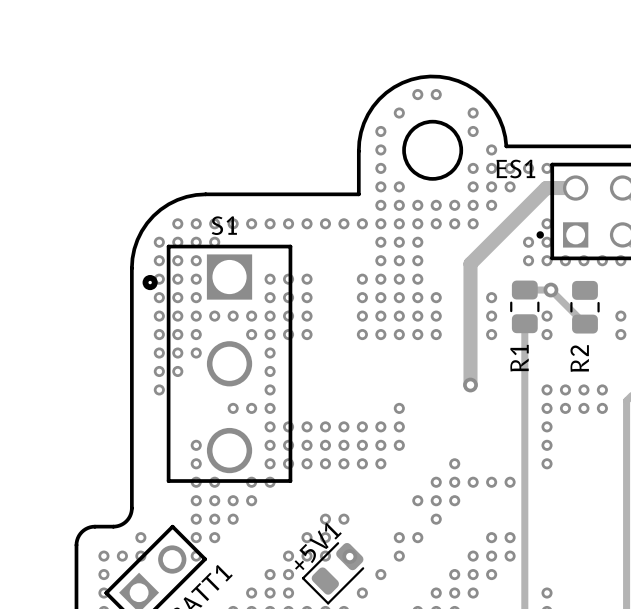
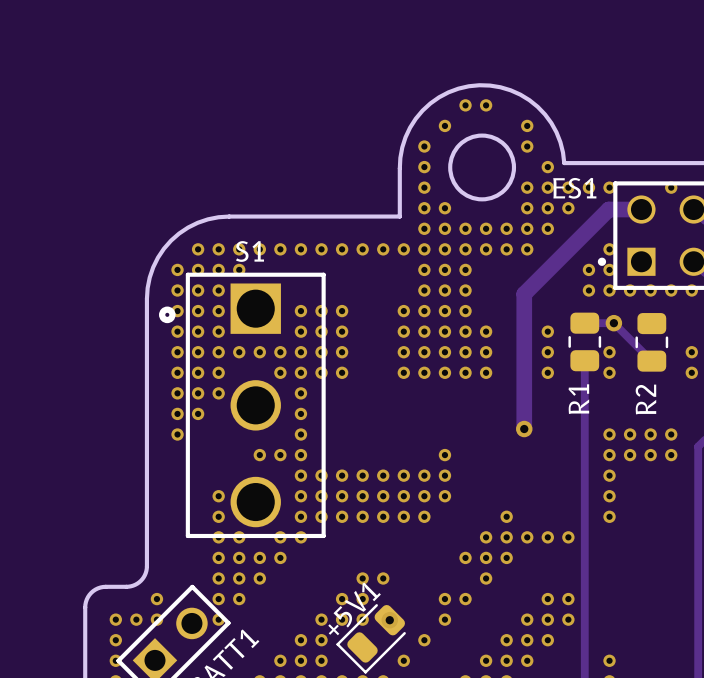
via: none -> (671, 187)

